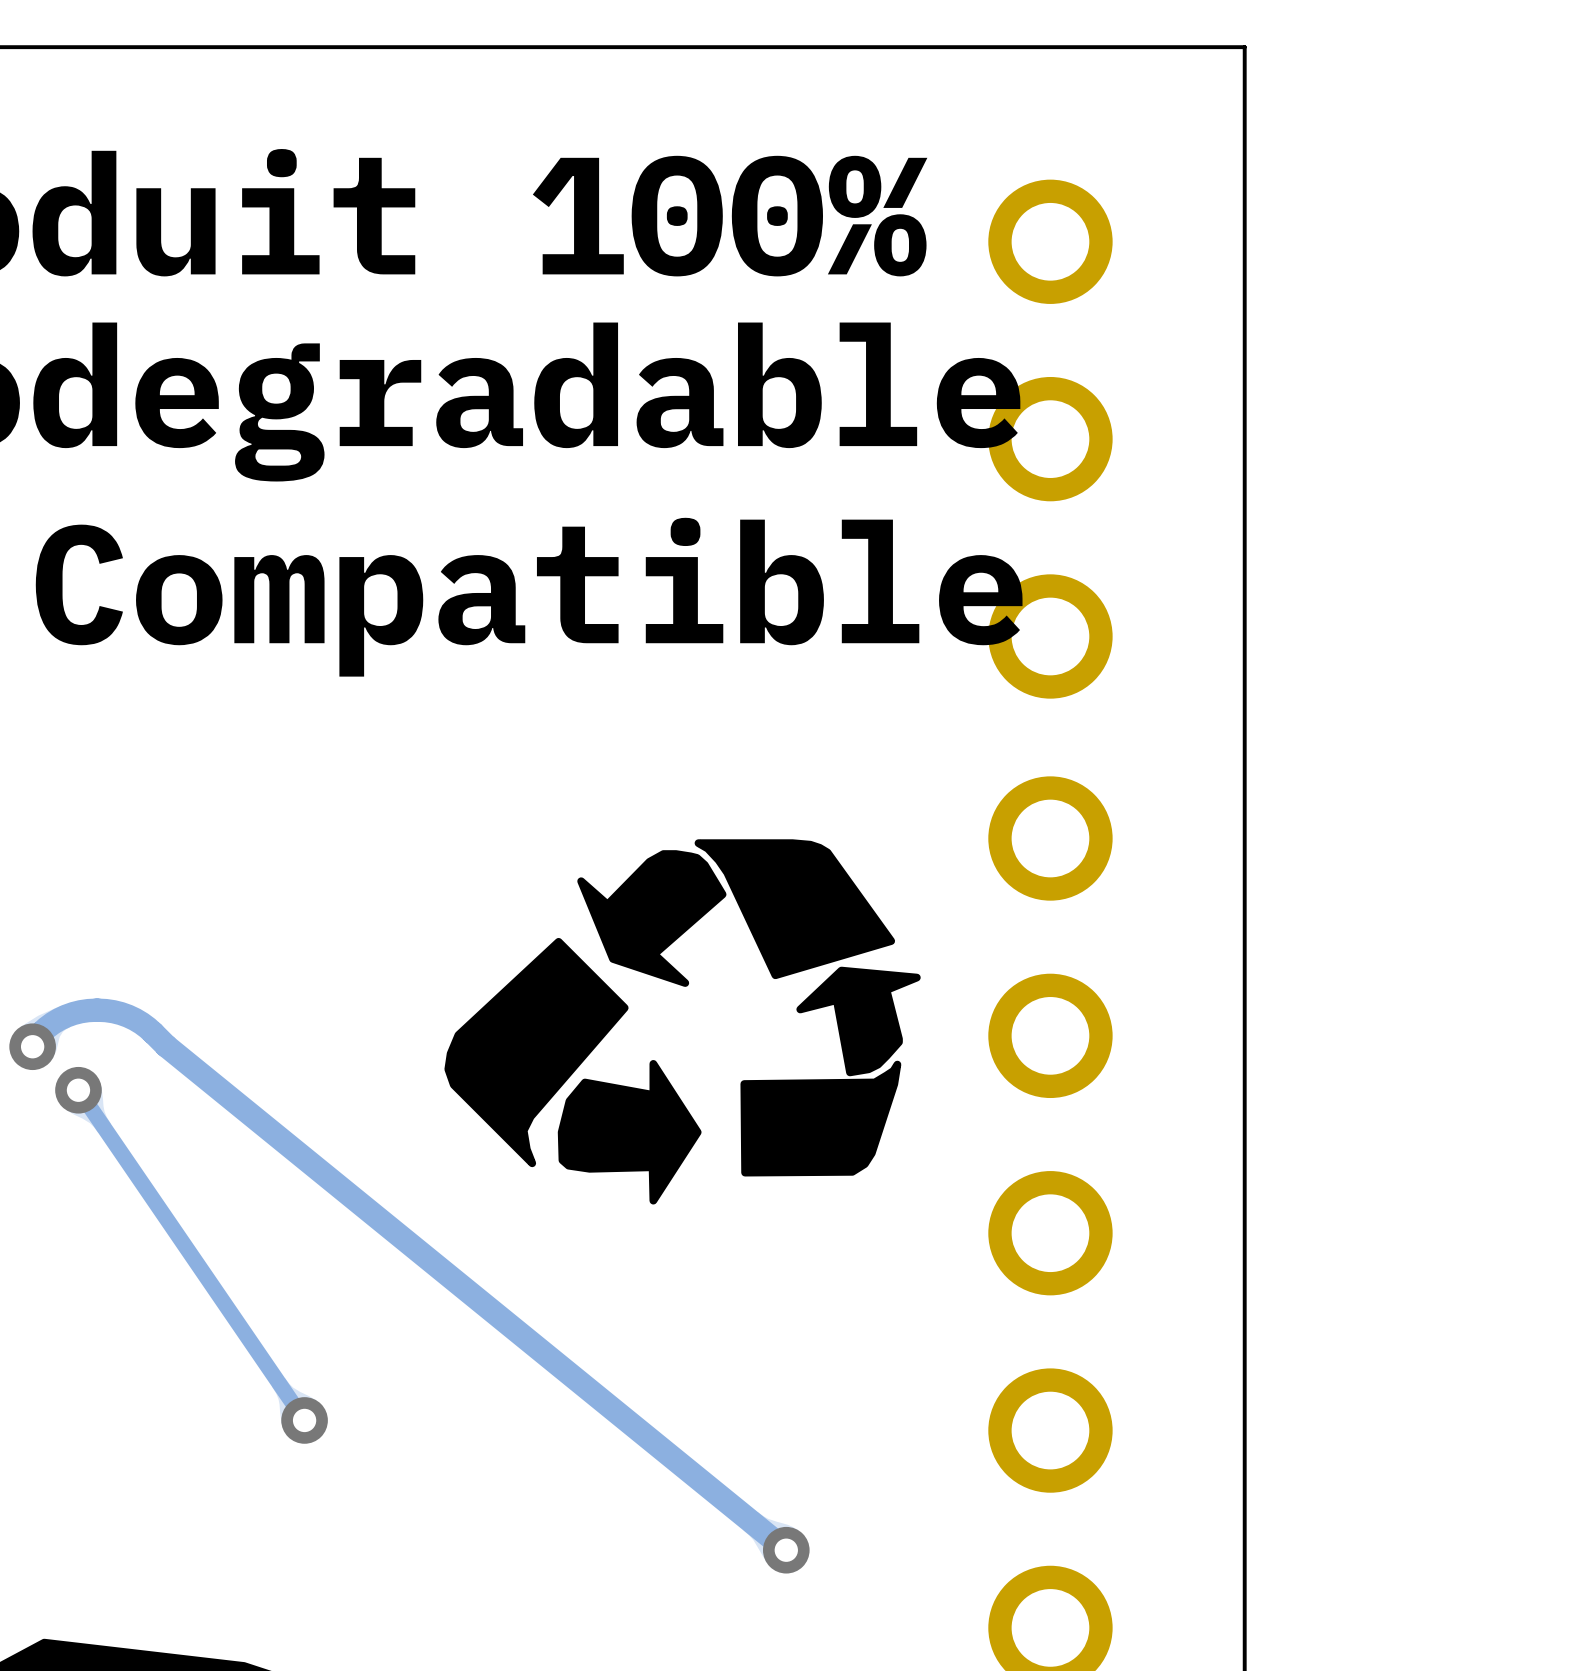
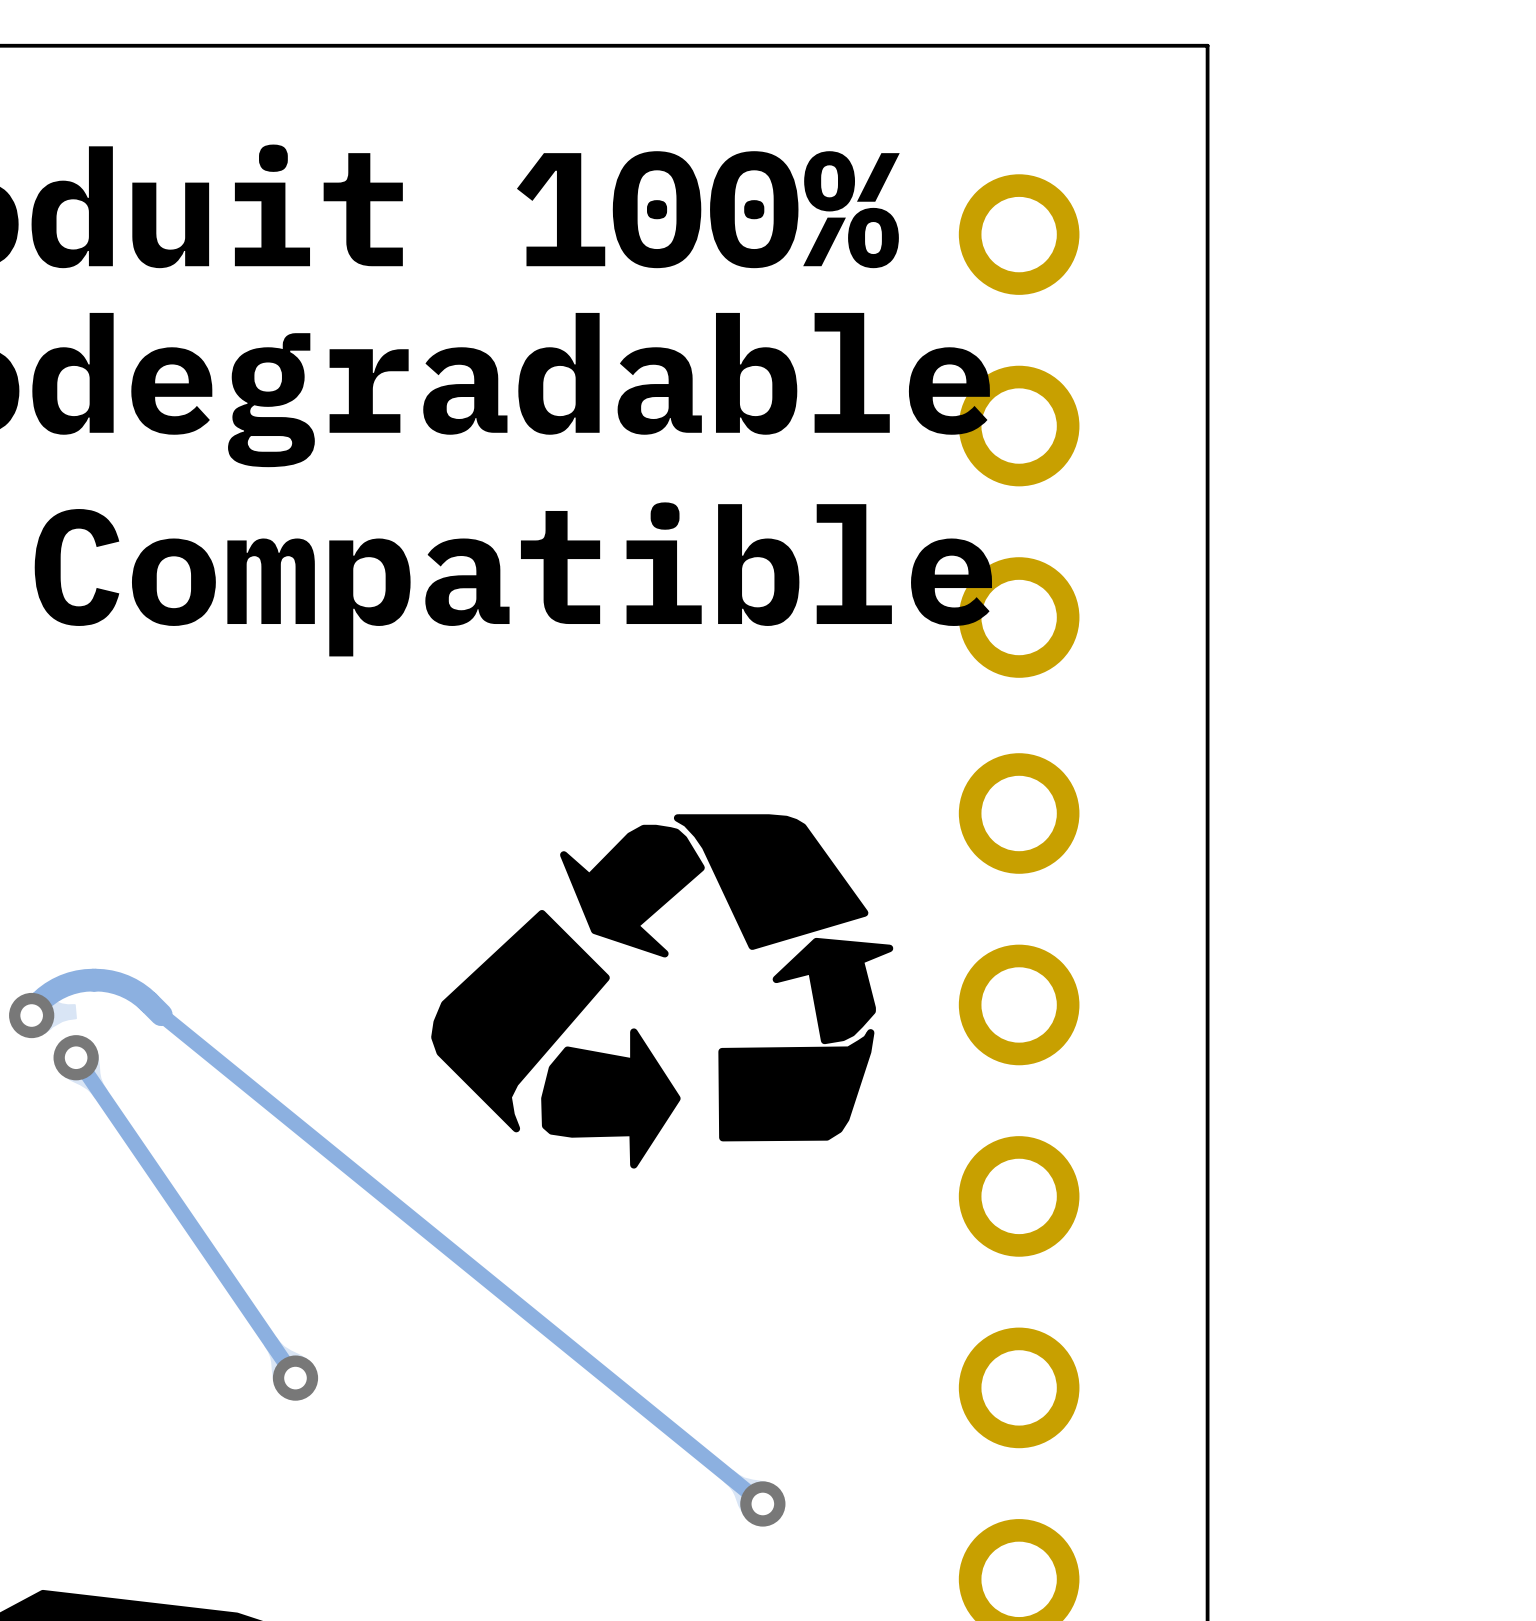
track width: thick (166, 1045) (786, 1550) -> thin (161, 1014) (762, 1503)

